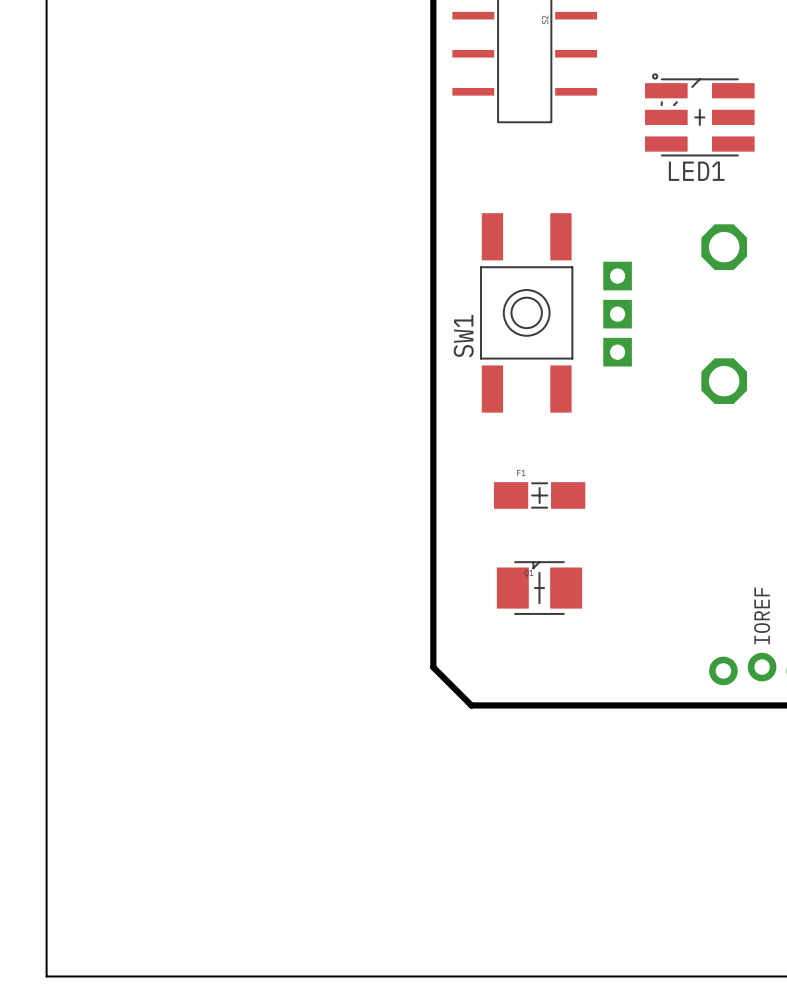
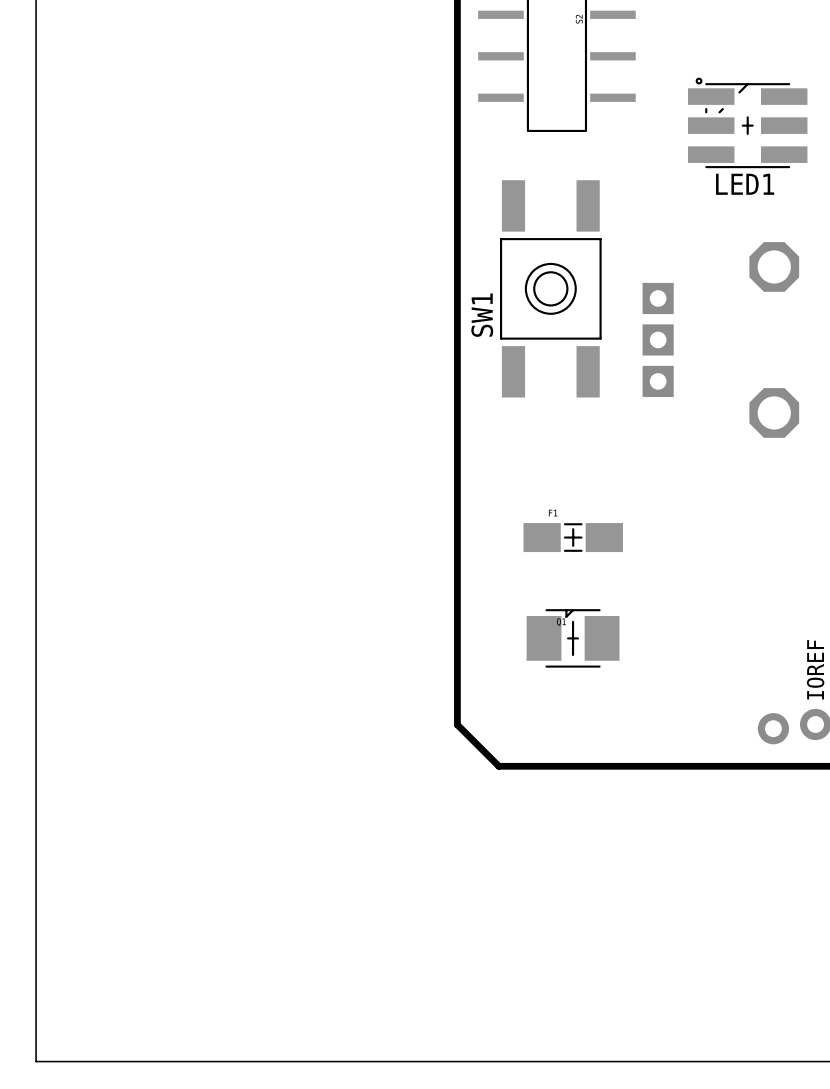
SW1 position: (526, 312) -> (550, 288)

